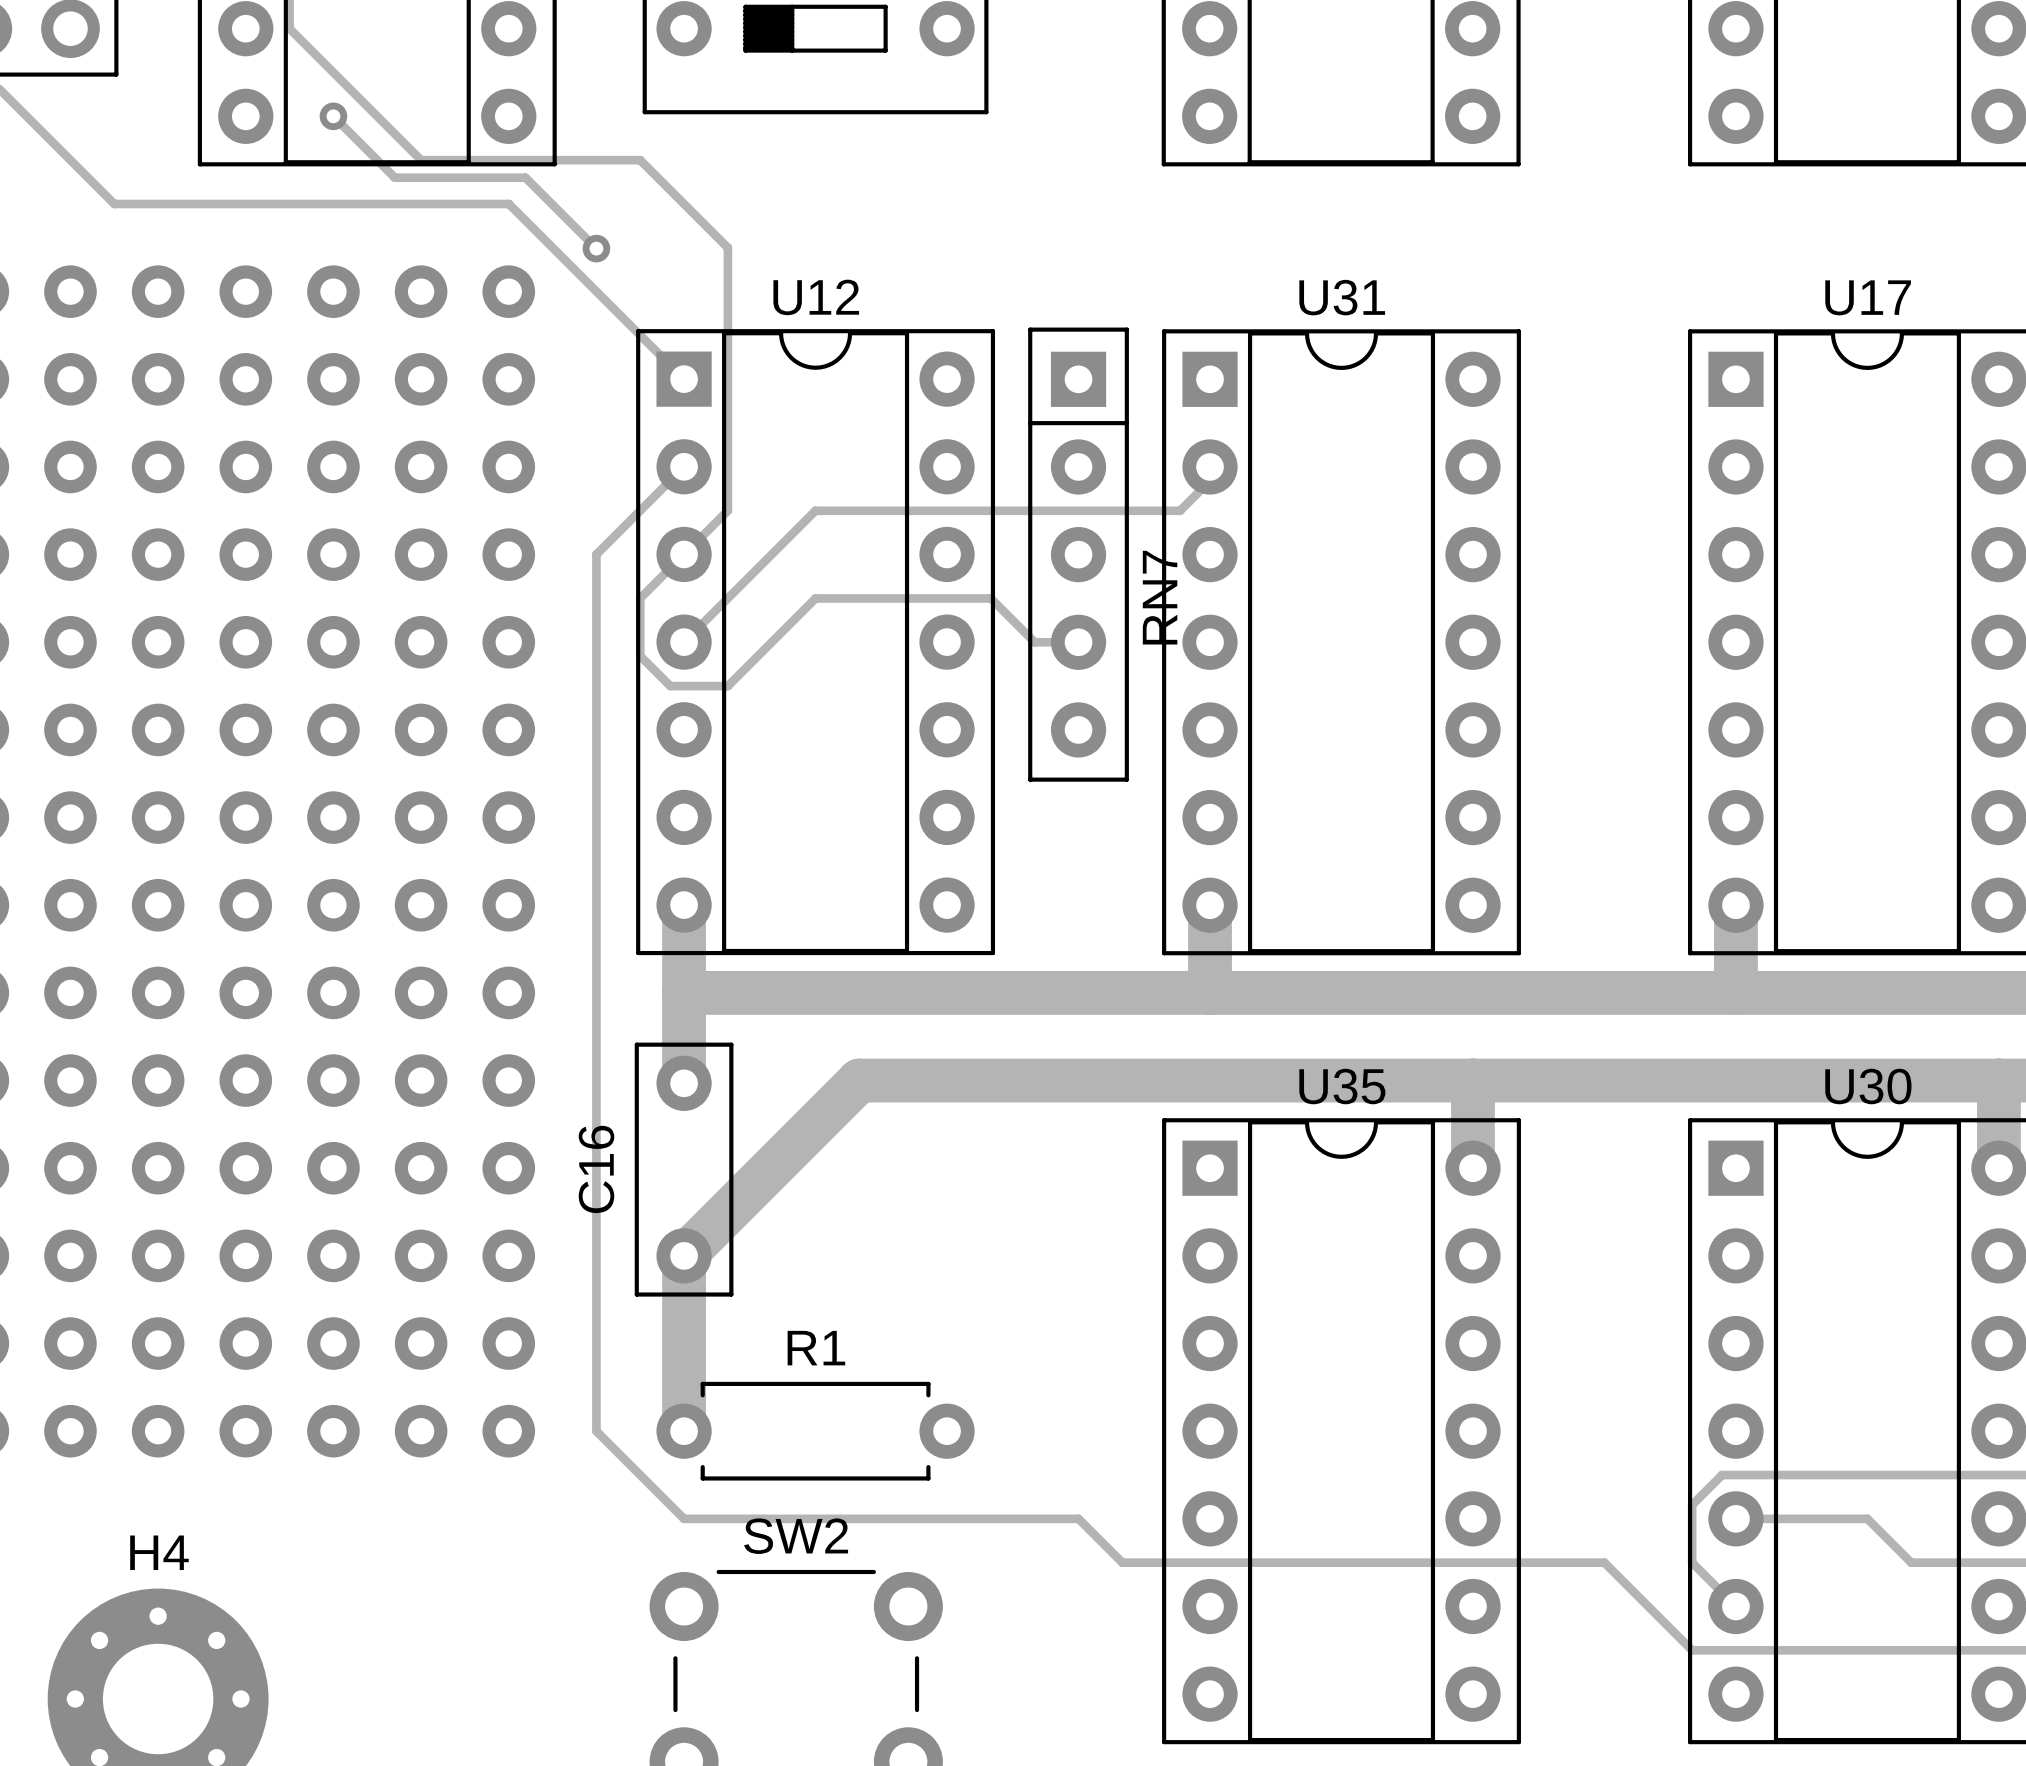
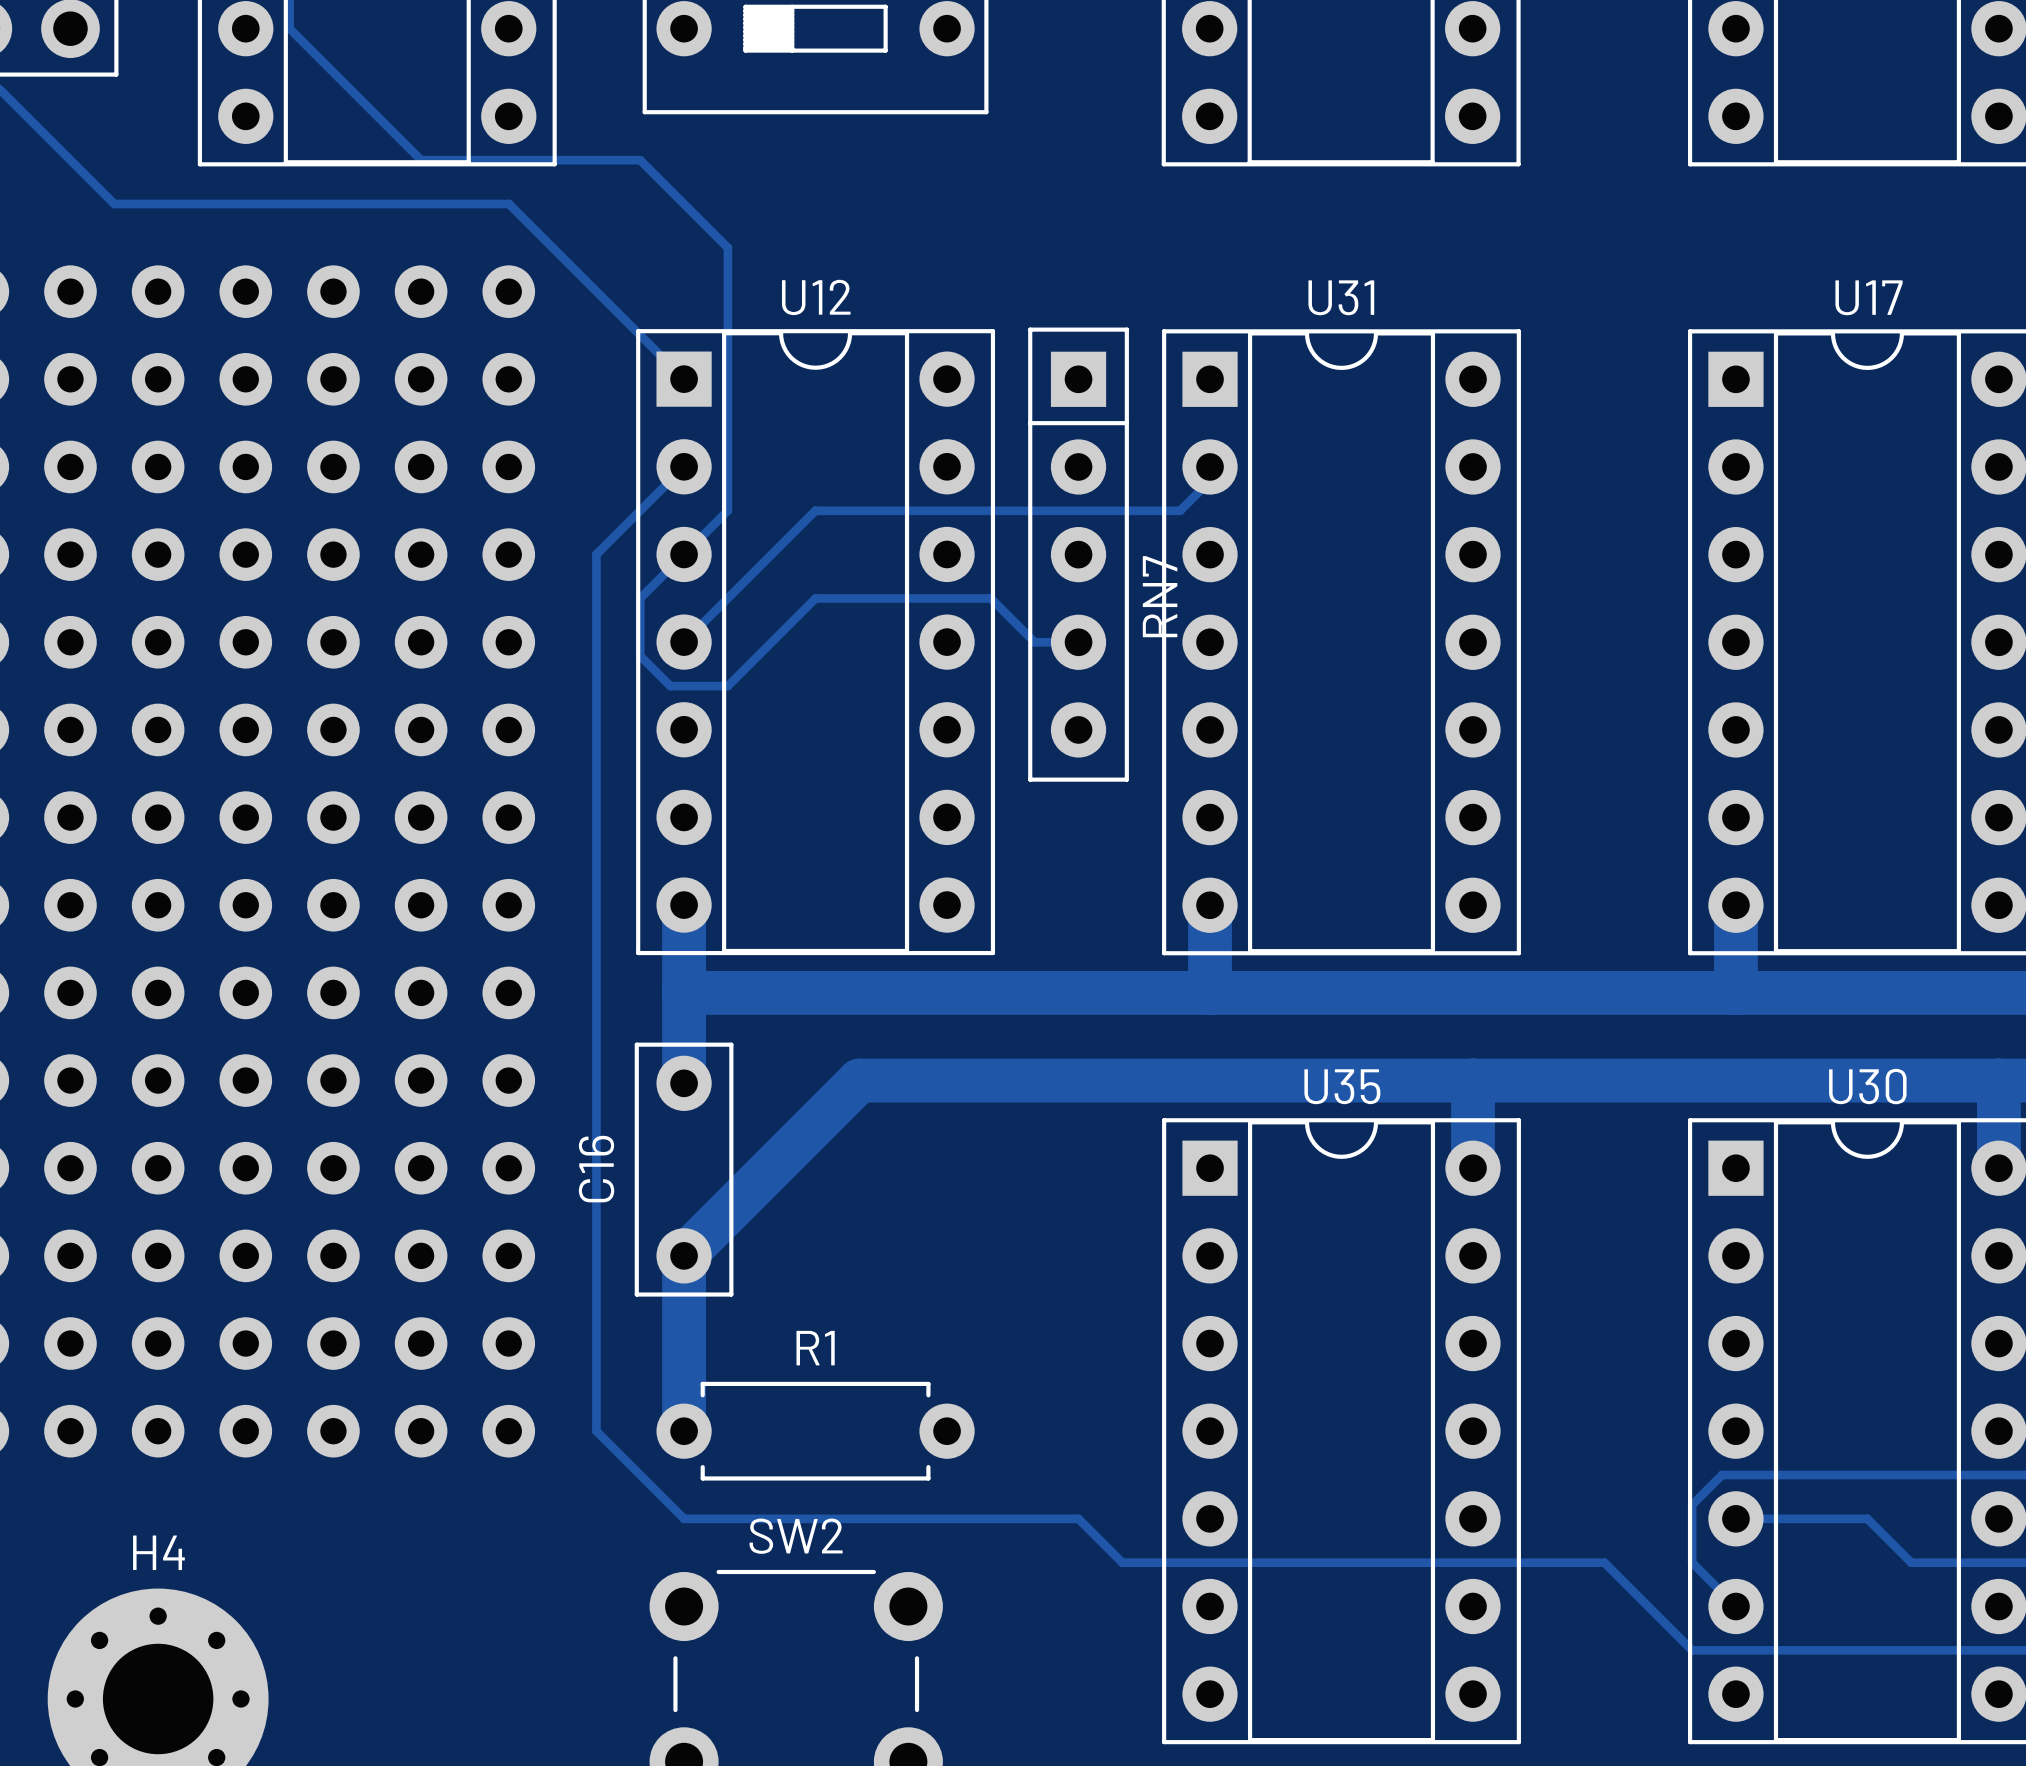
track: (333, 116) (394, 177) (525, 177) (596, 248) -> none
via: (333, 116) -> none
via: (596, 248) -> none

